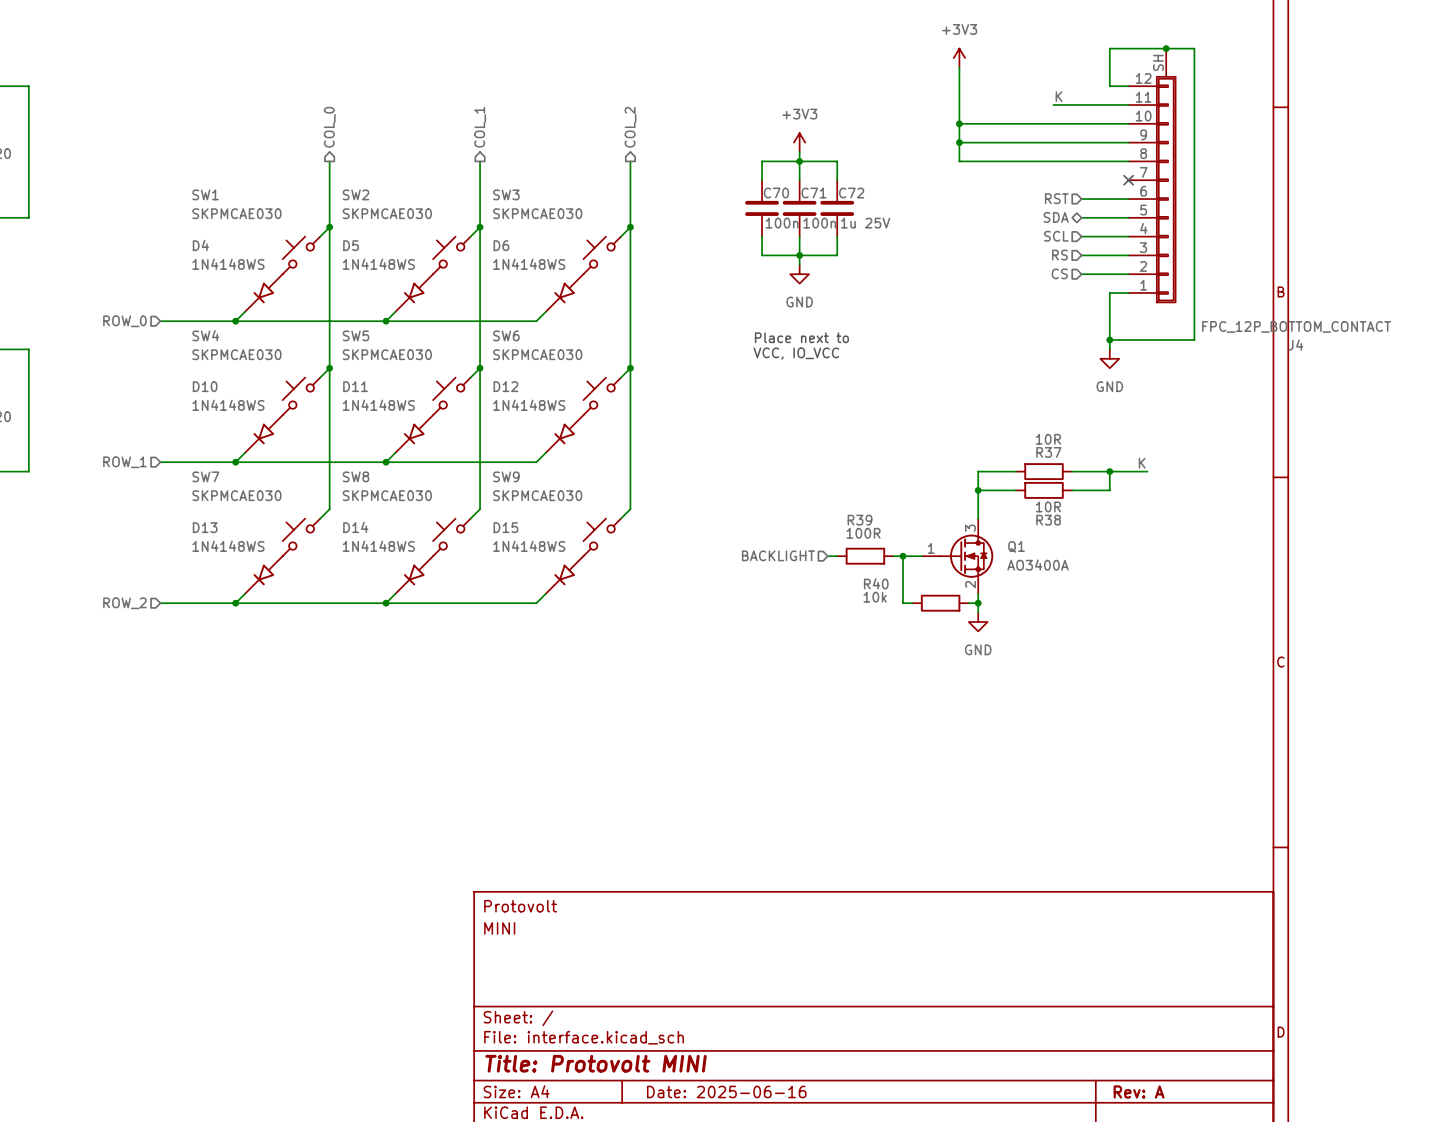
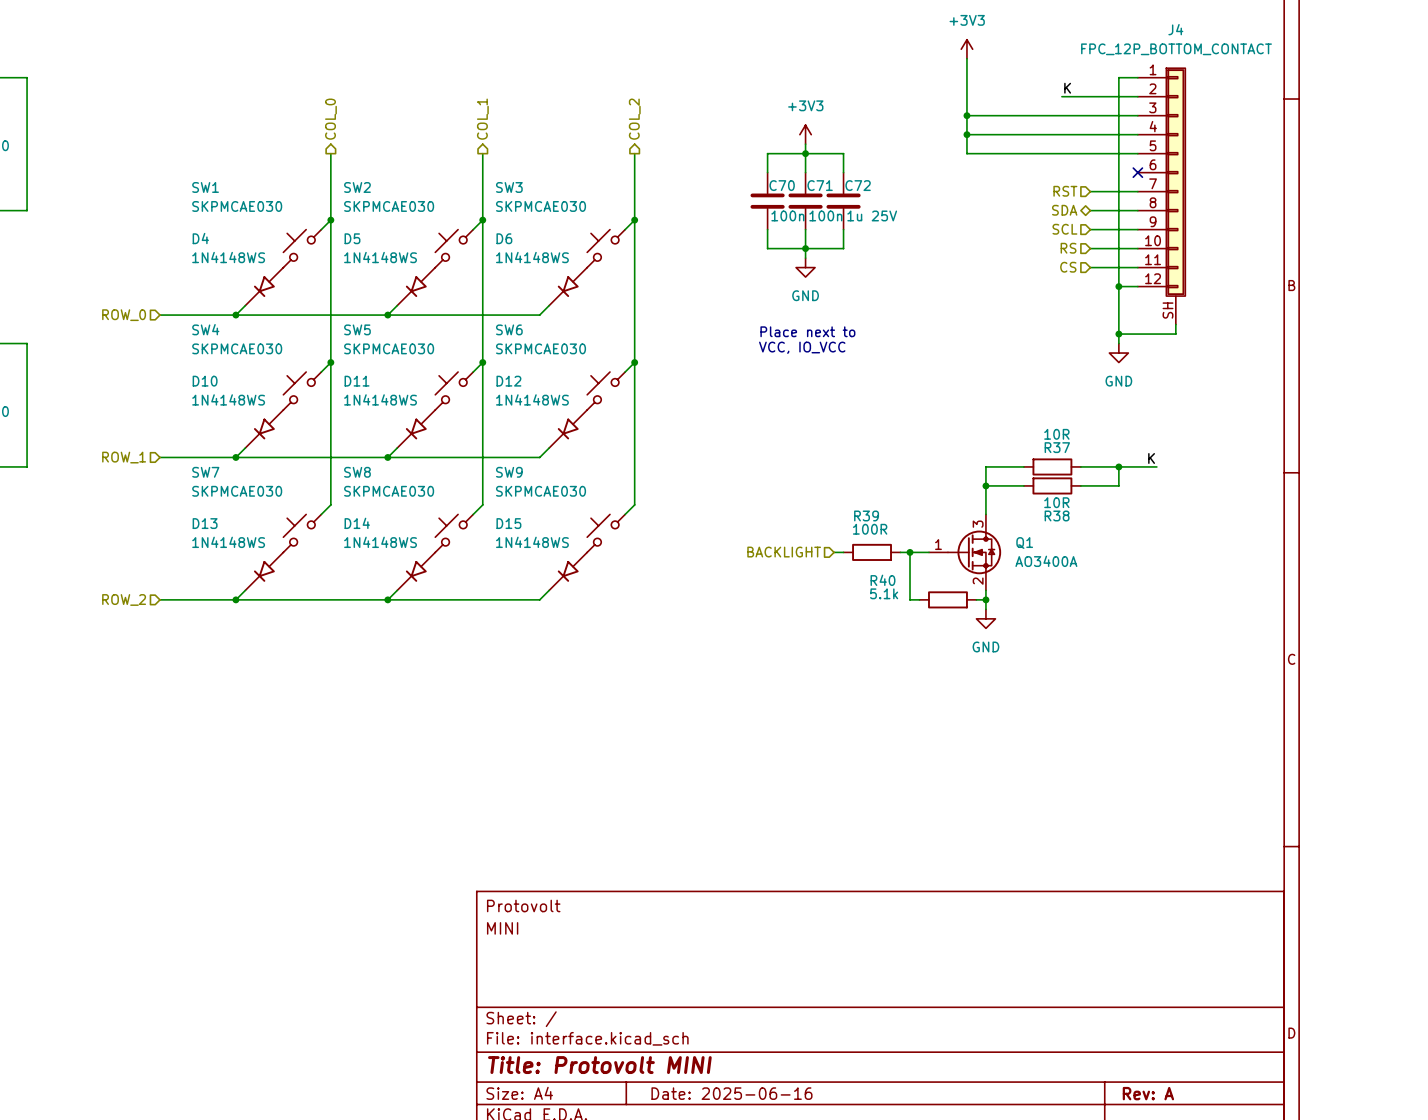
junction: (1166, 48) -> none
wire: (1109, 86) (1109, 48) (1194, 48) (1194, 340) (1166, 340) -> (1118, 77) (1118, 286)
J4 flip: as is (1166, 189) -> up-down (1175, 182)
junction: none -> (1118, 286)
J4 value position: FPC_12P_BOTTOM_CONTACT (1296, 326) -> FPC_12P_BOTTOM_CONTACT (1176, 49)
wire: none -> (1175, 324) (1175, 334)
J4 name position: J4 (1295, 345) -> J4 (1175, 29)
R40 value: 10k (875, 597) -> 5.1k (884, 593)

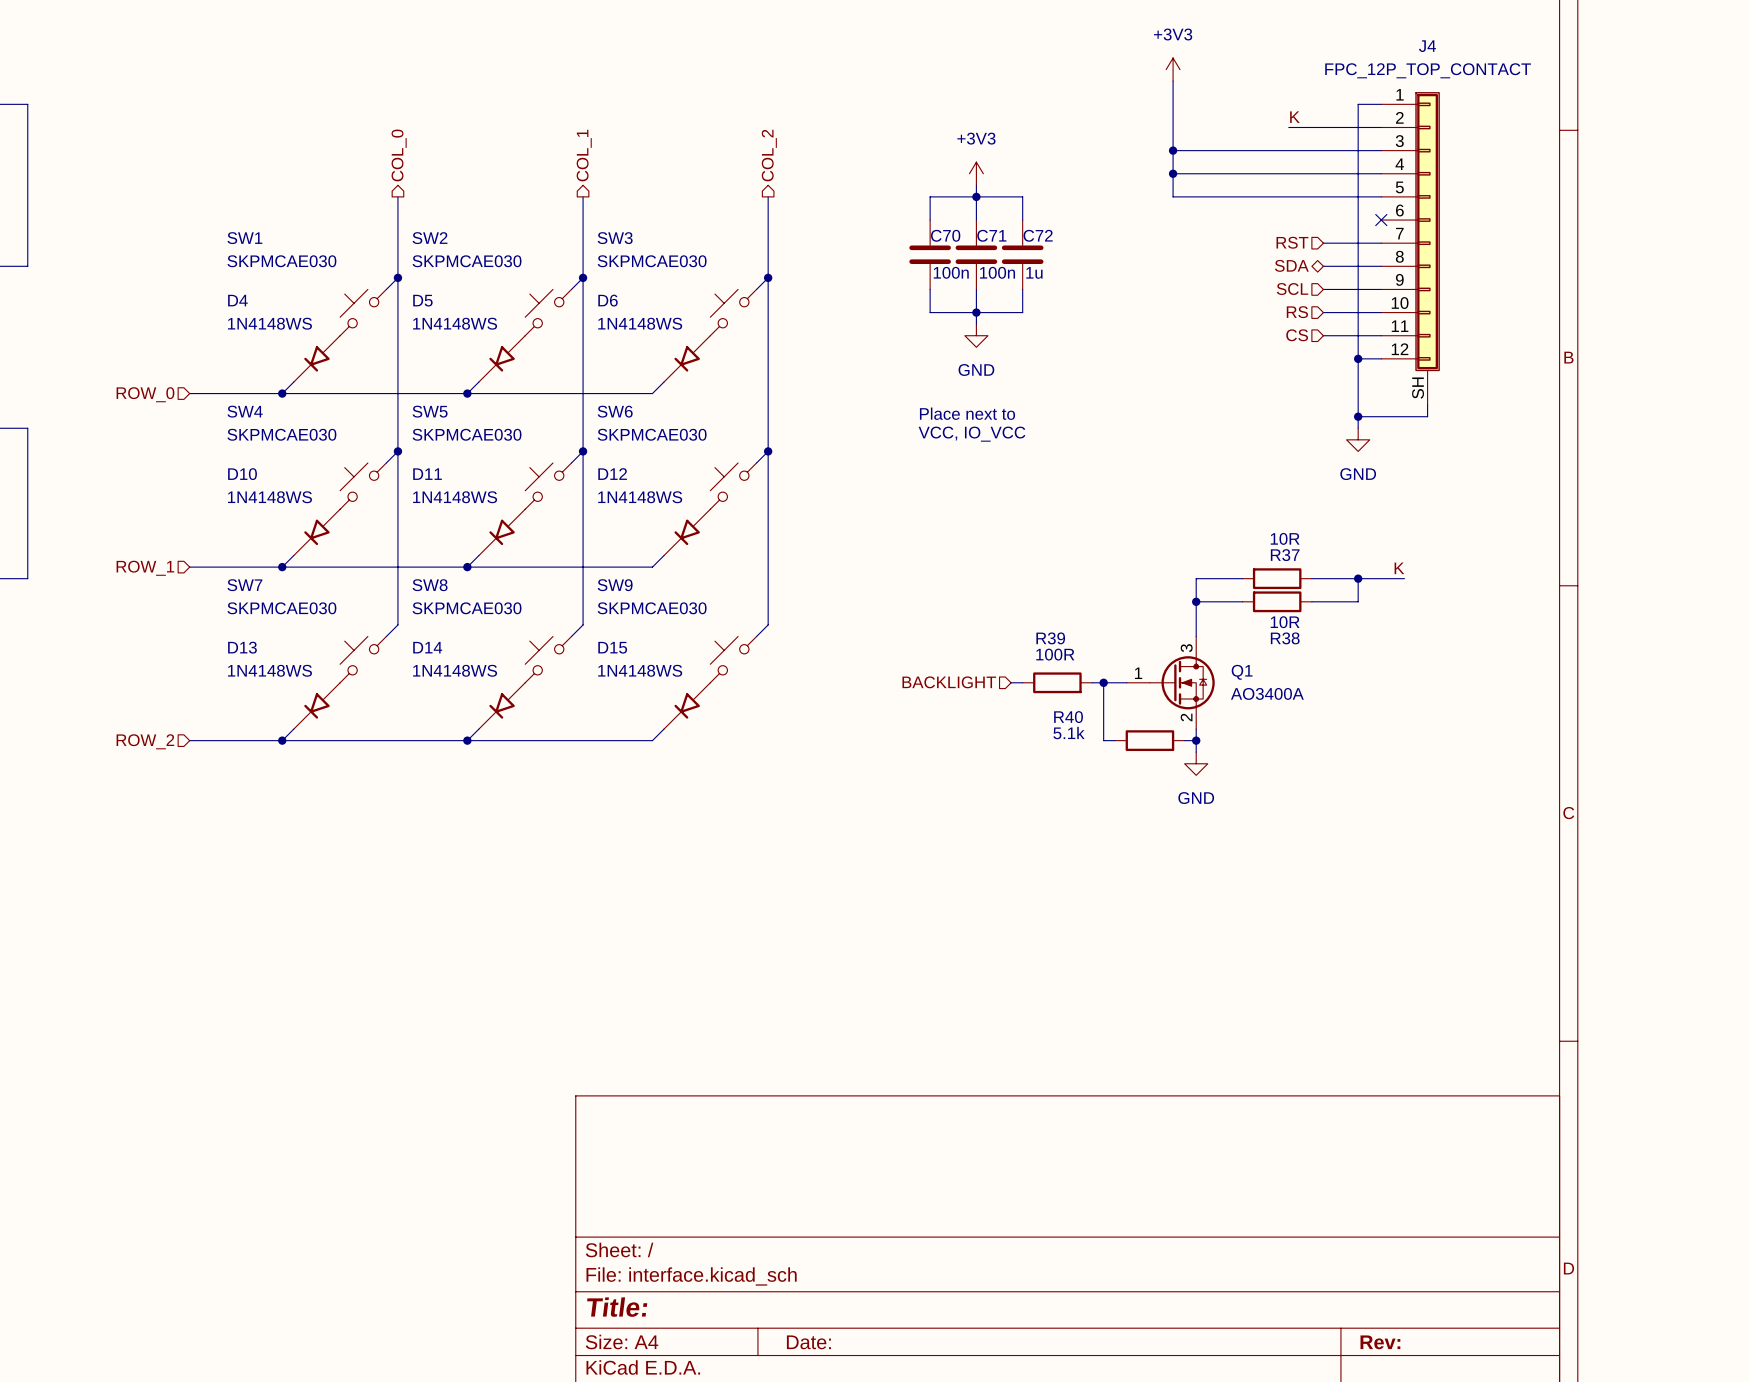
J4 value: FPC_12P_BOTTOM_CONTACT (1176, 49) -> FPC_12P_TOP_CONTACT (1428, 70)
C72 value: 1u 25V (872, 215) -> 1u (1034, 272)
title block: Protovolt (523, 905) -> none
title block: MINI (502, 928) -> none
title block: Title: Protovolt MINI (599, 1065) -> Title: (617, 1307)
title block: Date: 2025-06-16 (731, 1093) -> Date: (808, 1342)
title block: Rev: A (1148, 1093) -> Rev: (1380, 1342)

